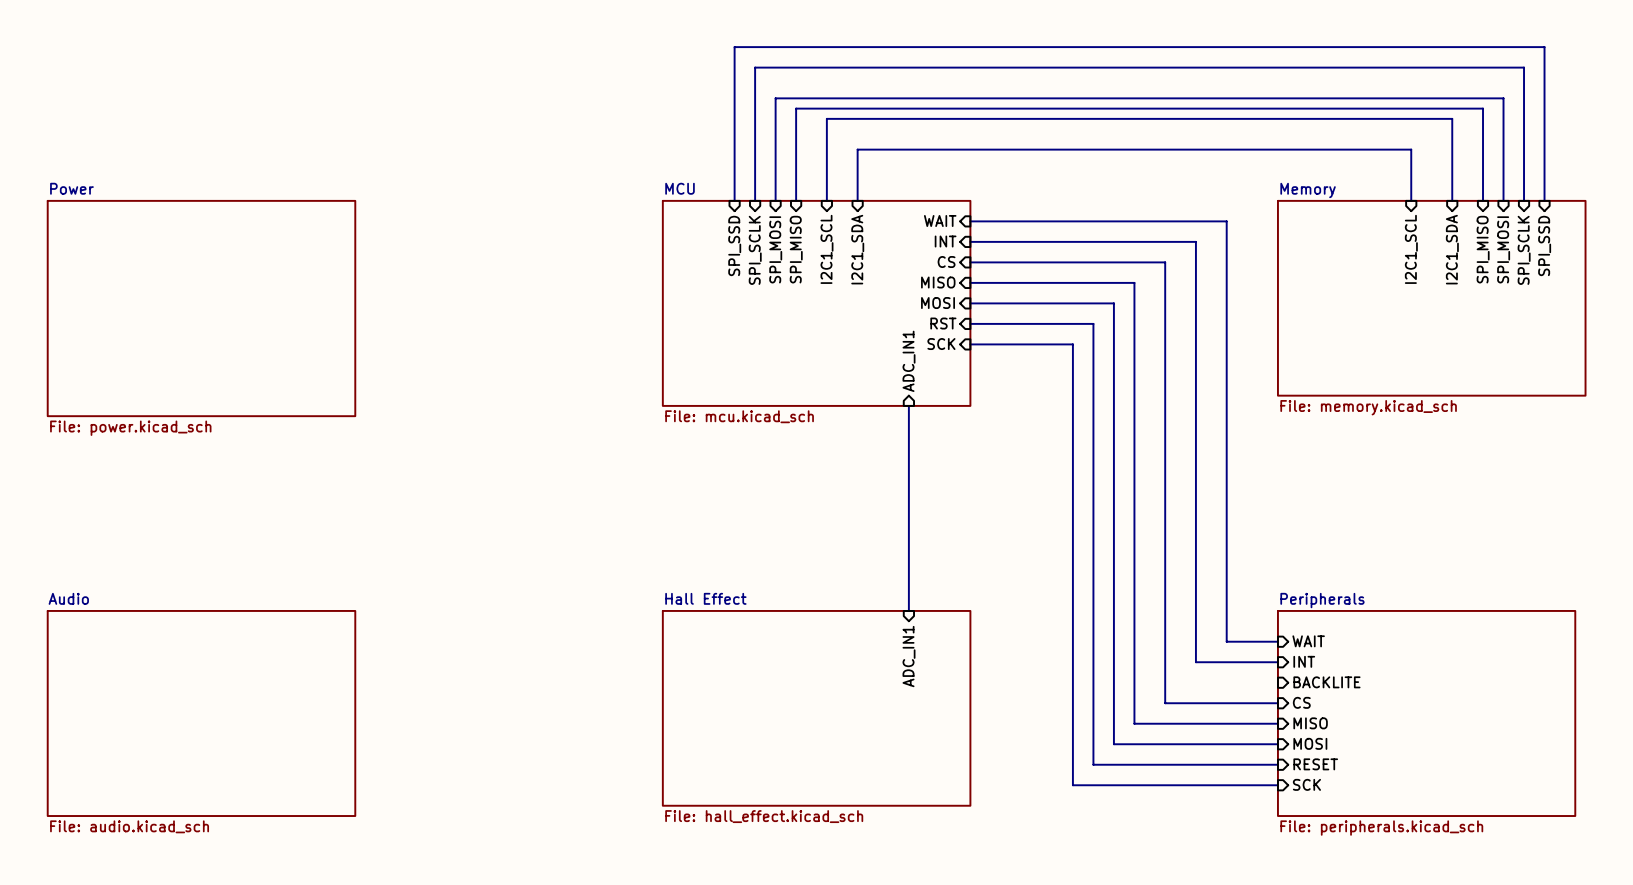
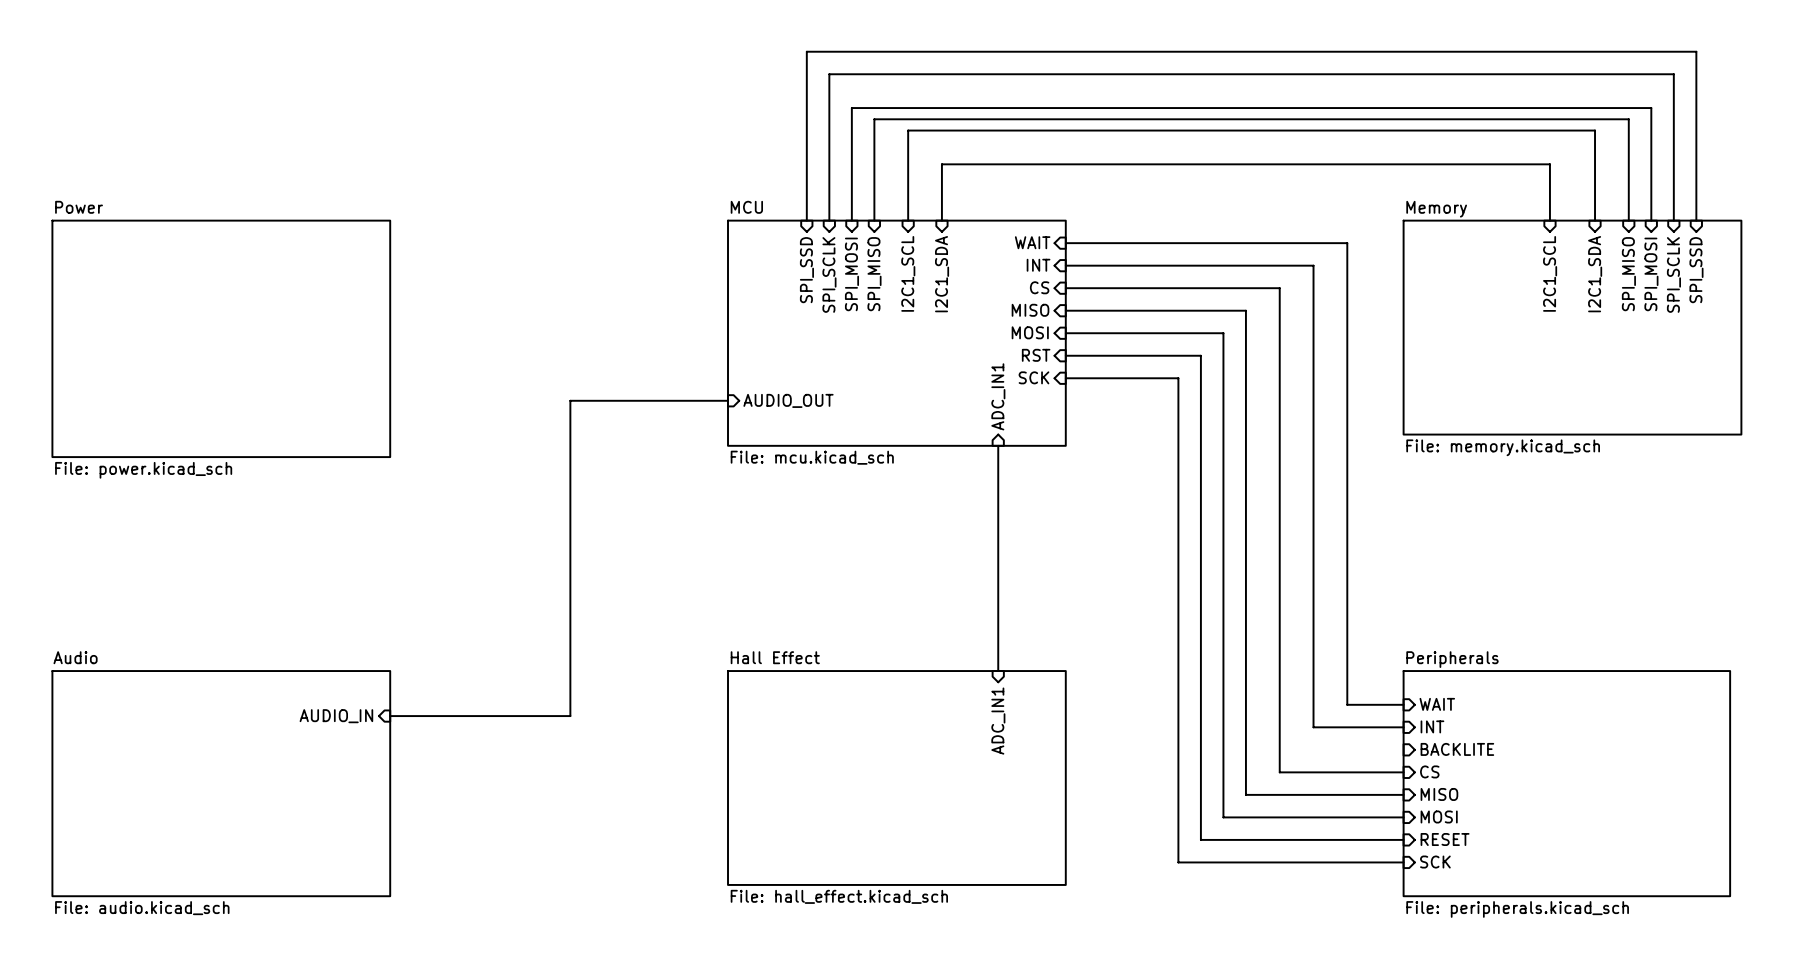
wire: none -> (728, 400) (570, 400) (570, 716) (390, 716)
sheet pin: none -> AUDIO_OUT (788, 400)
sheet pin: none -> AUDIO_IN (336, 716)

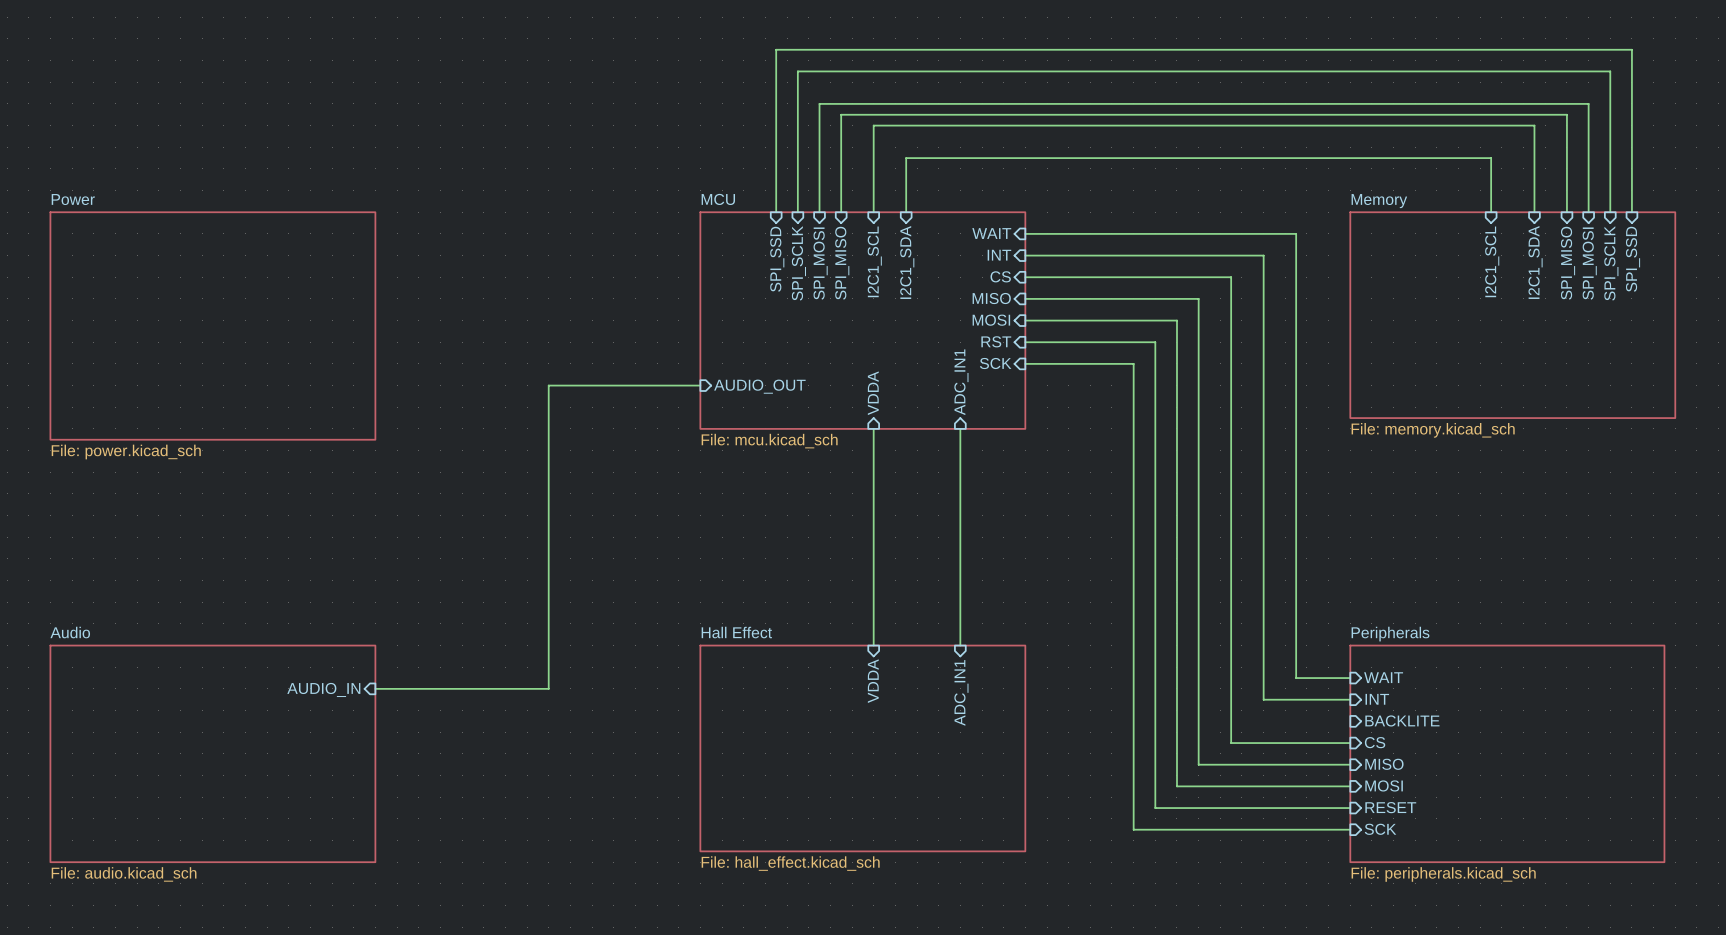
sheet pin: none -> VDDA (873, 393)
wire: none -> (873, 428) (873, 645)
sheet pin: none -> VDDA (873, 681)

